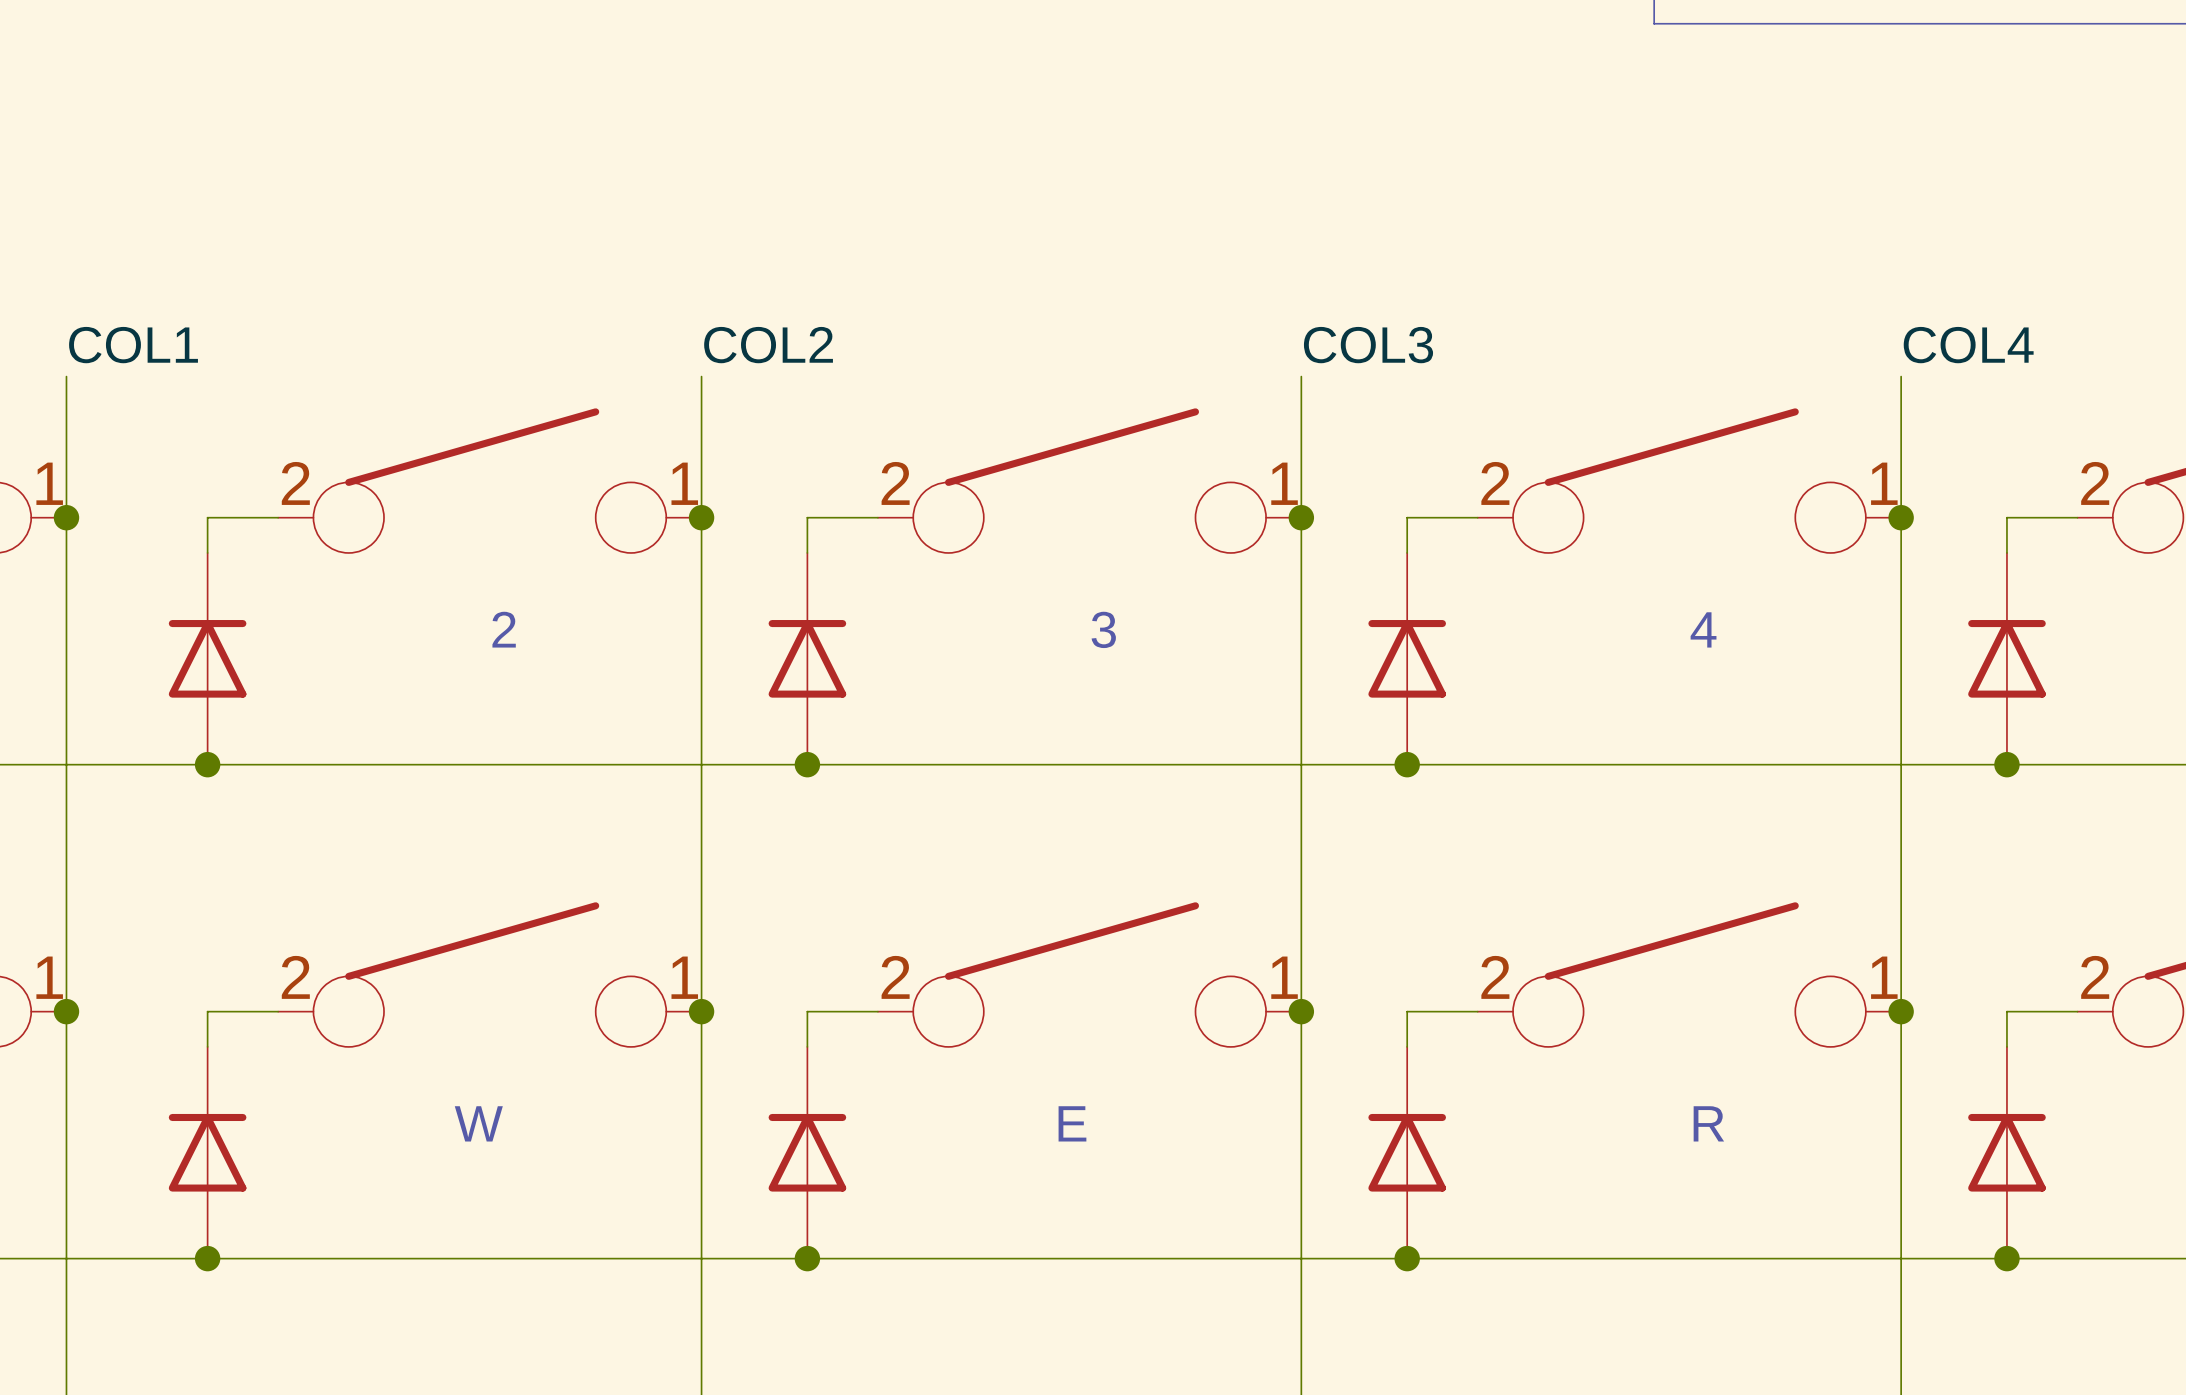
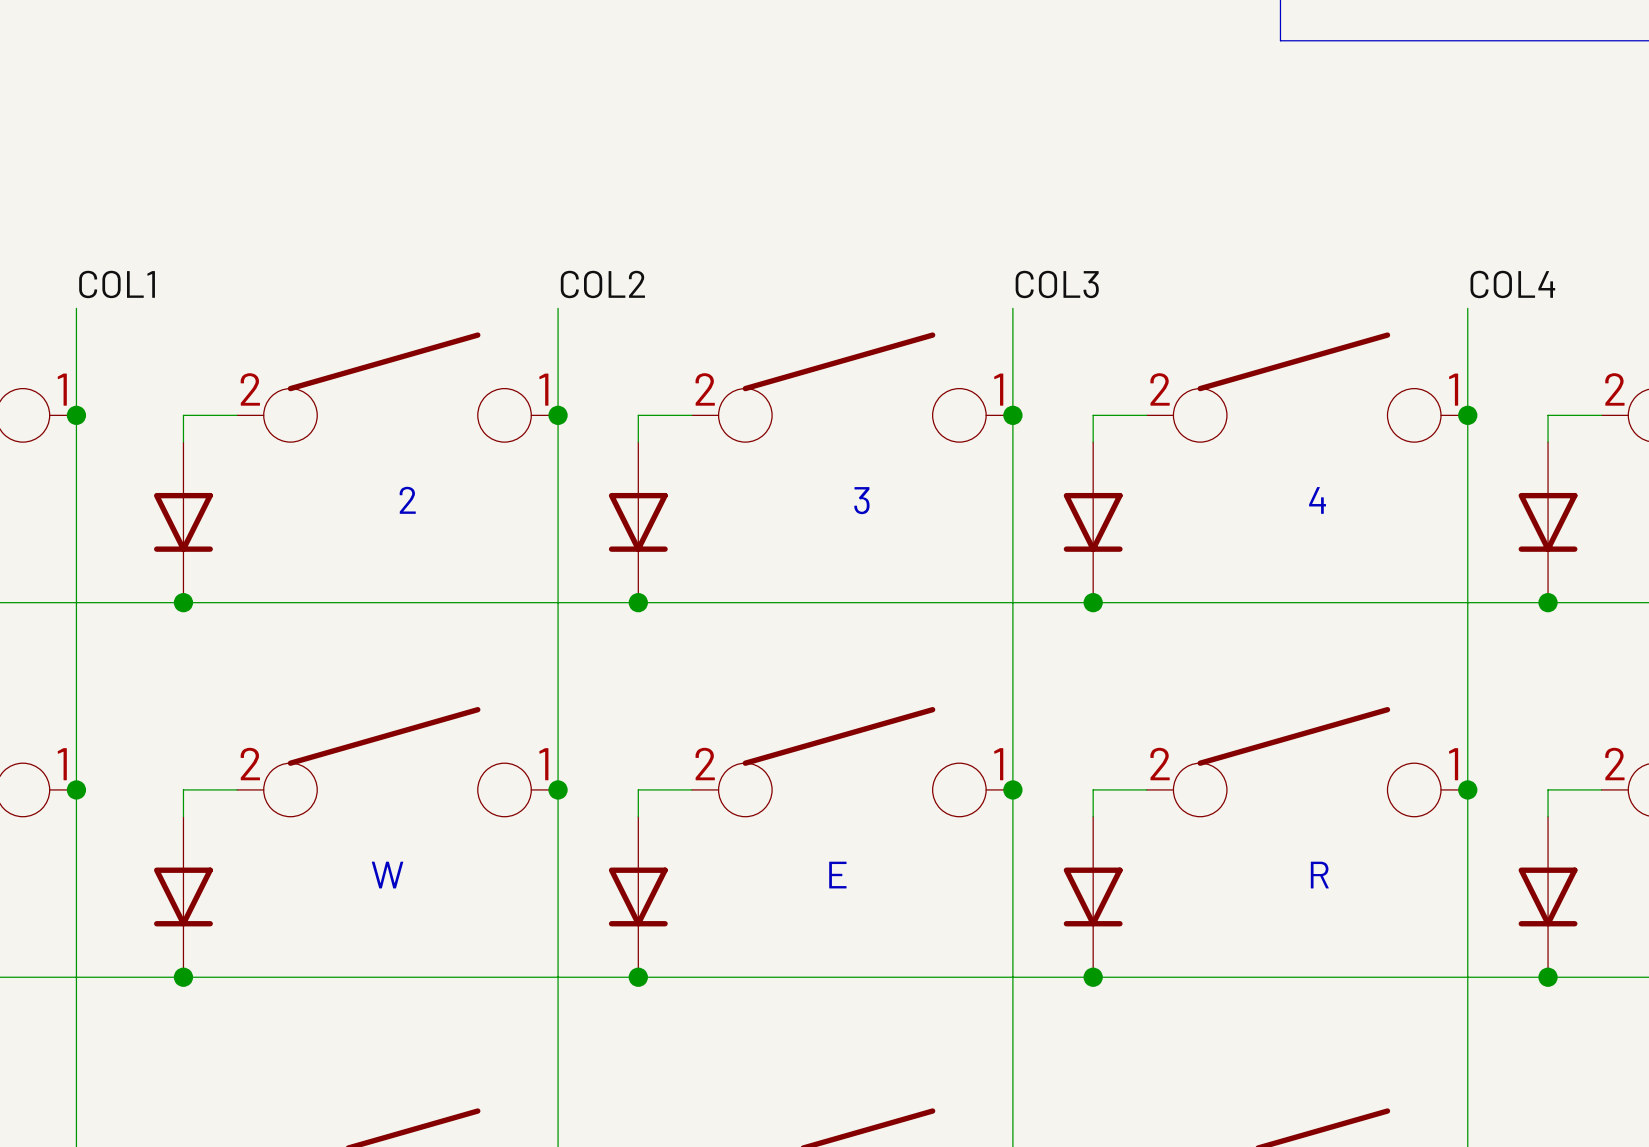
part rotation: 0° (207, 658) -> 180° (183, 522)
part rotation: 0° (807, 658) -> 180° (638, 522)
part rotation: 0° (1407, 658) -> 180° (1093, 522)
part rotation: 0° (2006, 658) -> 180° (1548, 522)
part rotation: 0° (207, 1152) -> 180° (183, 896)
part rotation: 0° (807, 1152) -> 180° (638, 896)
part rotation: 0° (1407, 1152) -> 180° (1093, 896)
part rotation: 0° (2006, 1152) -> 180° (1548, 896)

